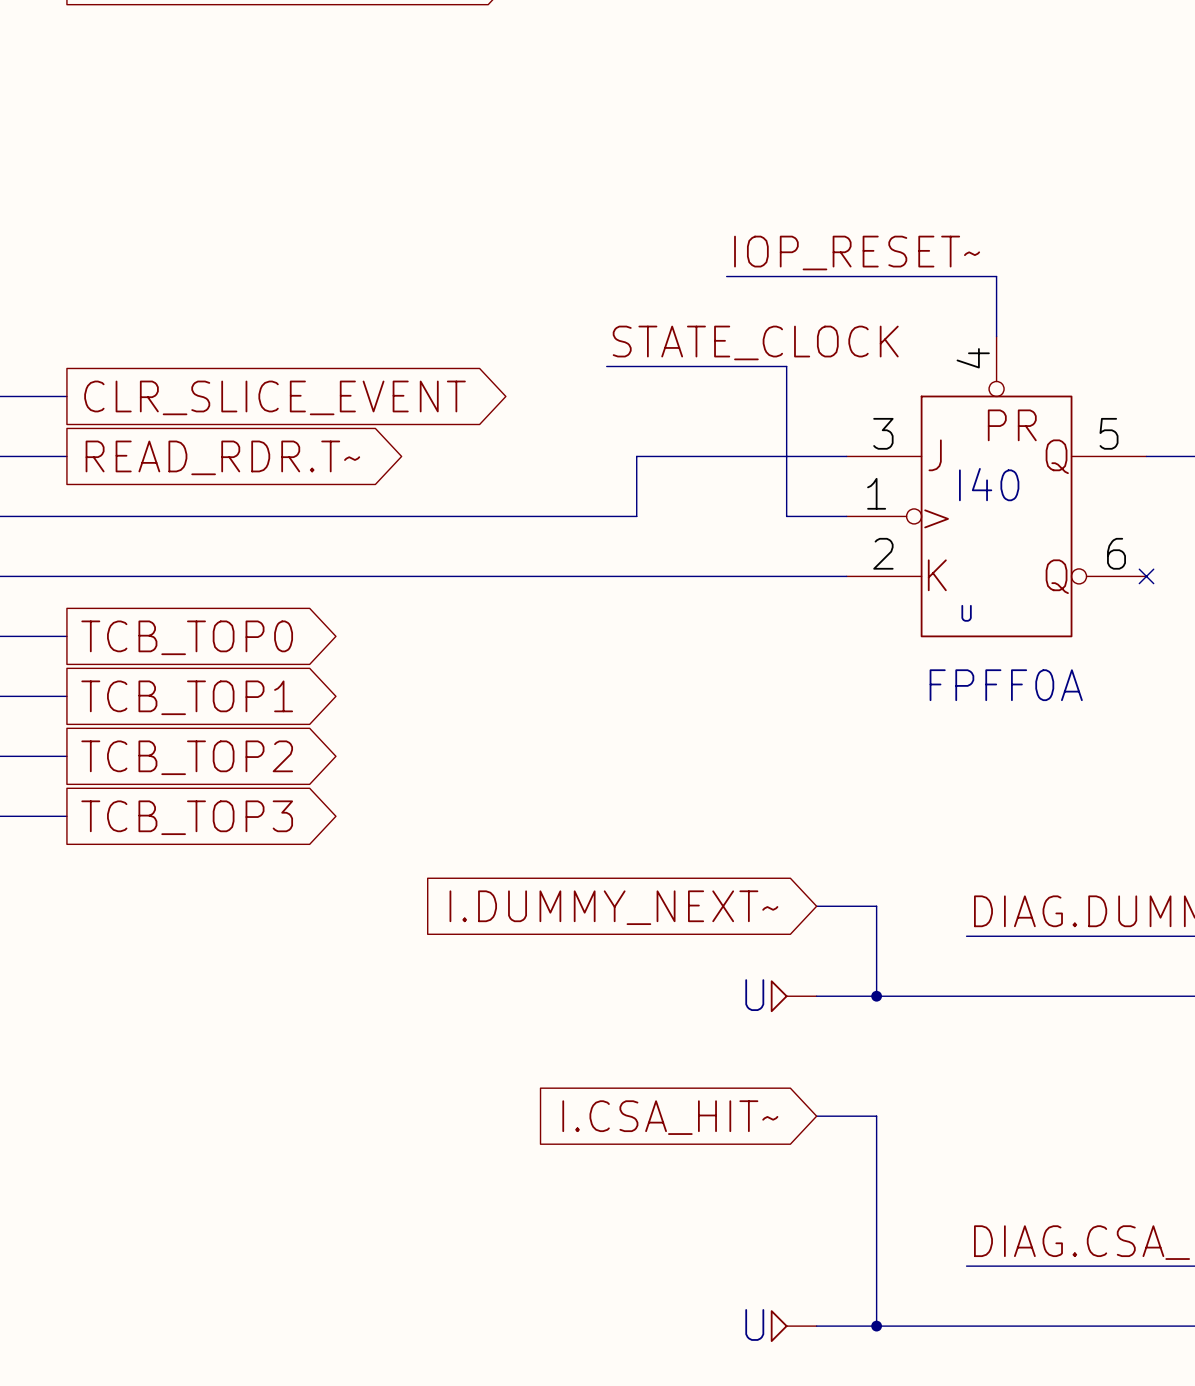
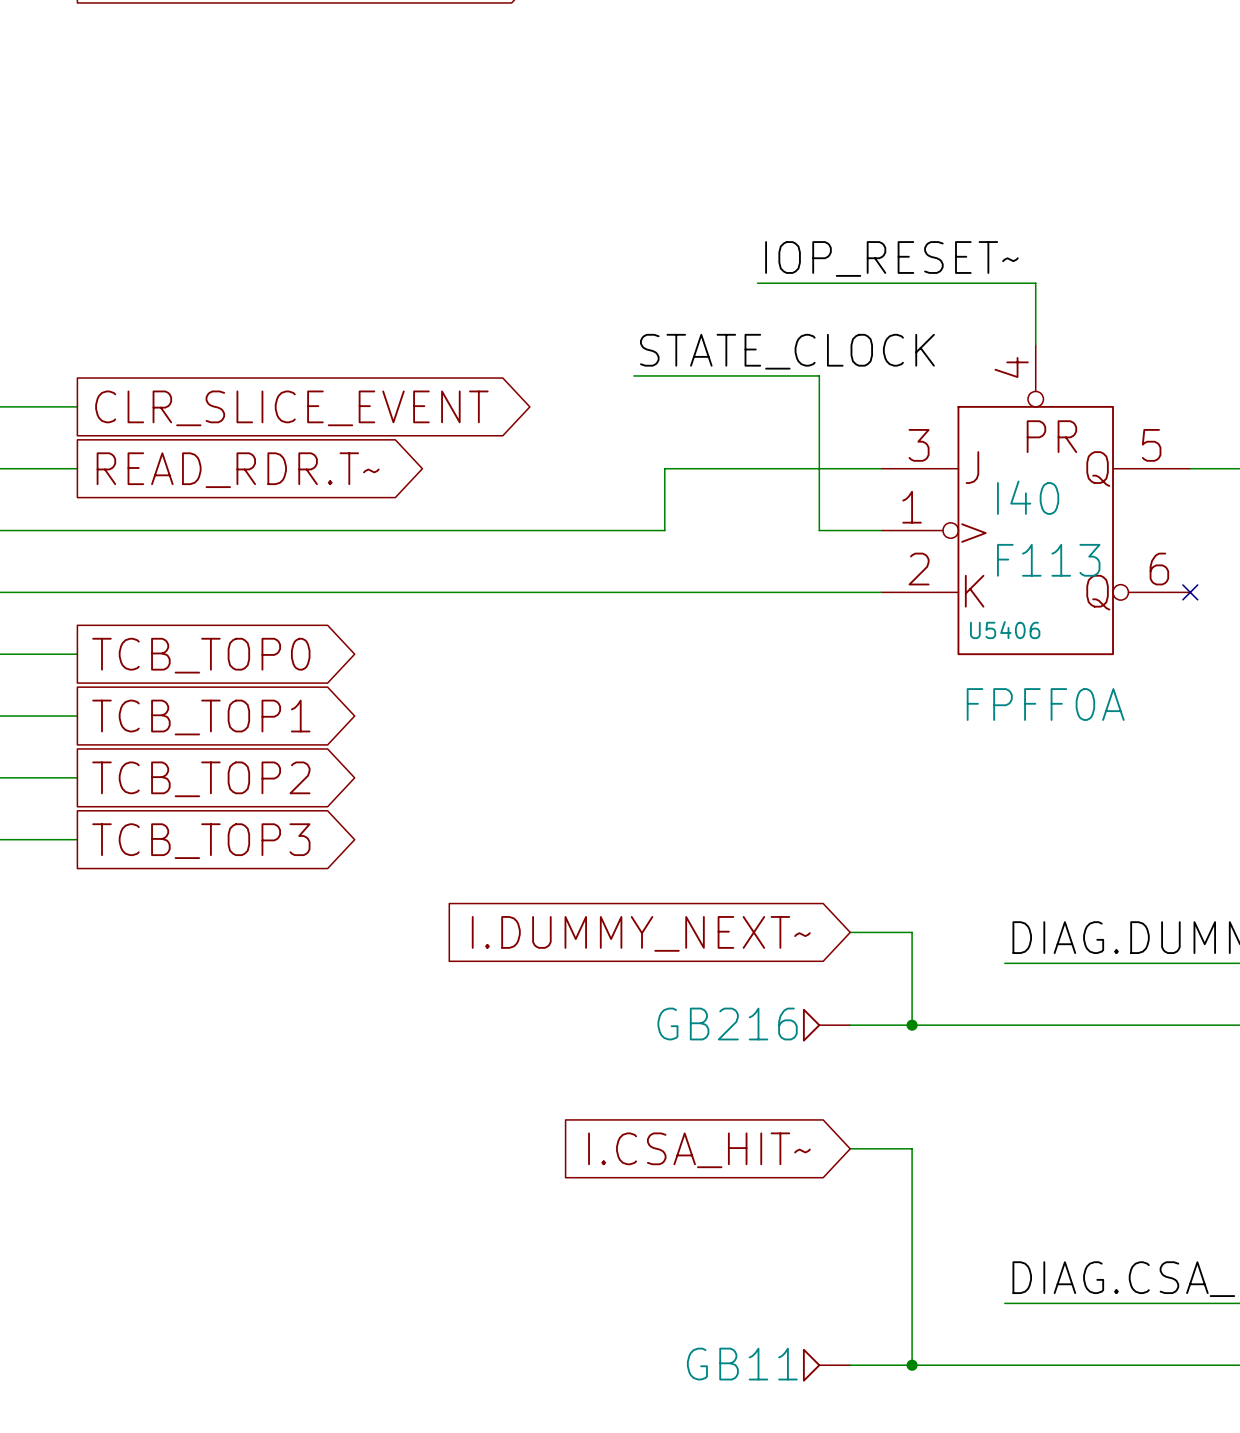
U value: none -> F113 (1048, 560)
U name: U (966, 613) -> U5406 (1005, 630)
U name: U (754, 995) -> GB216 (727, 1024)
U name: U (754, 1324) -> GB11 (742, 1364)

